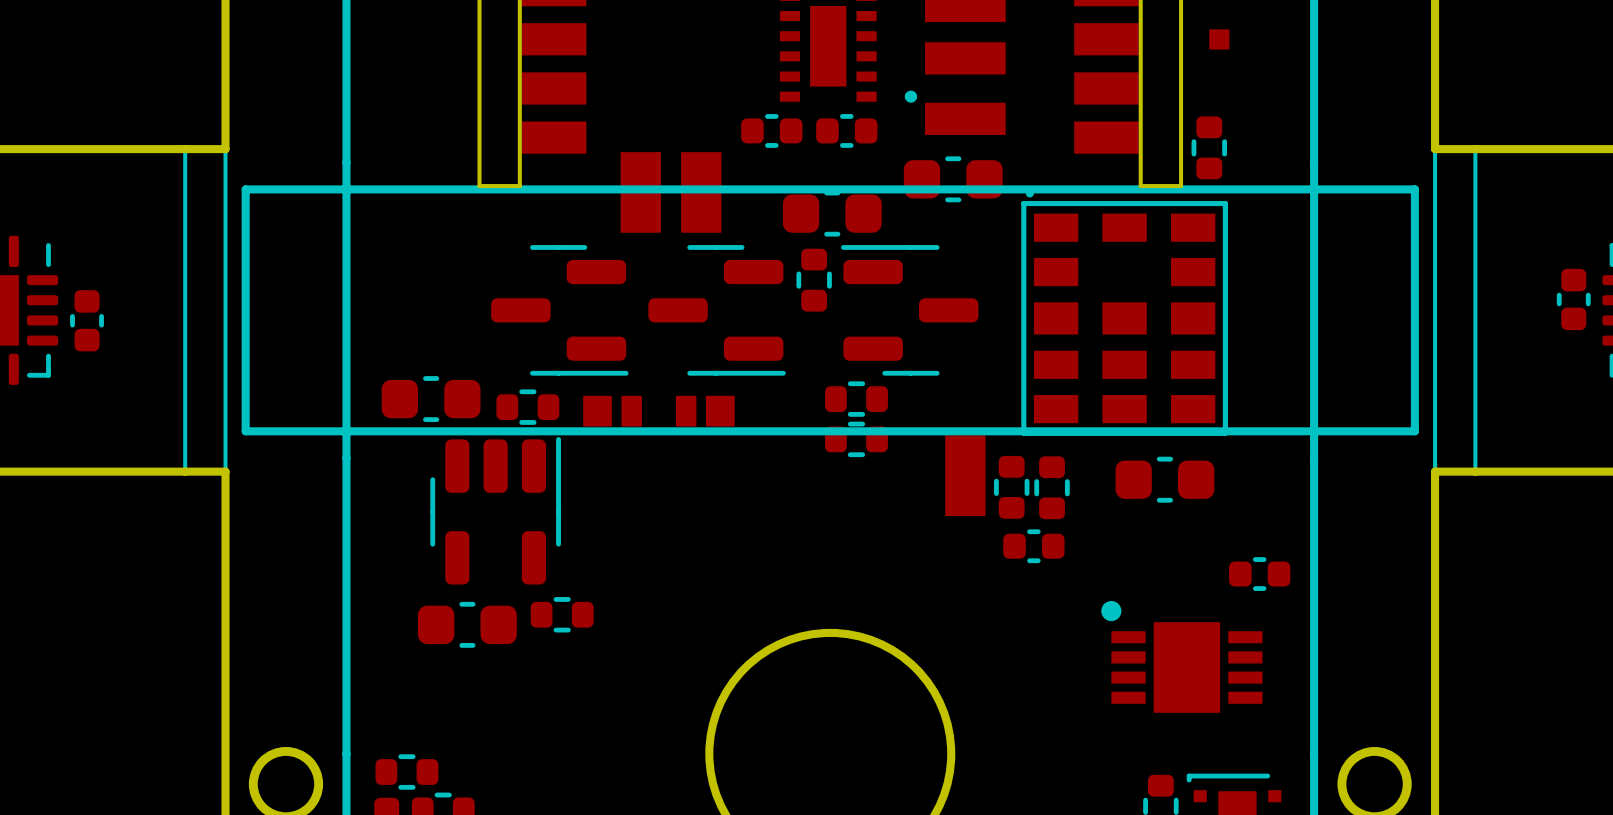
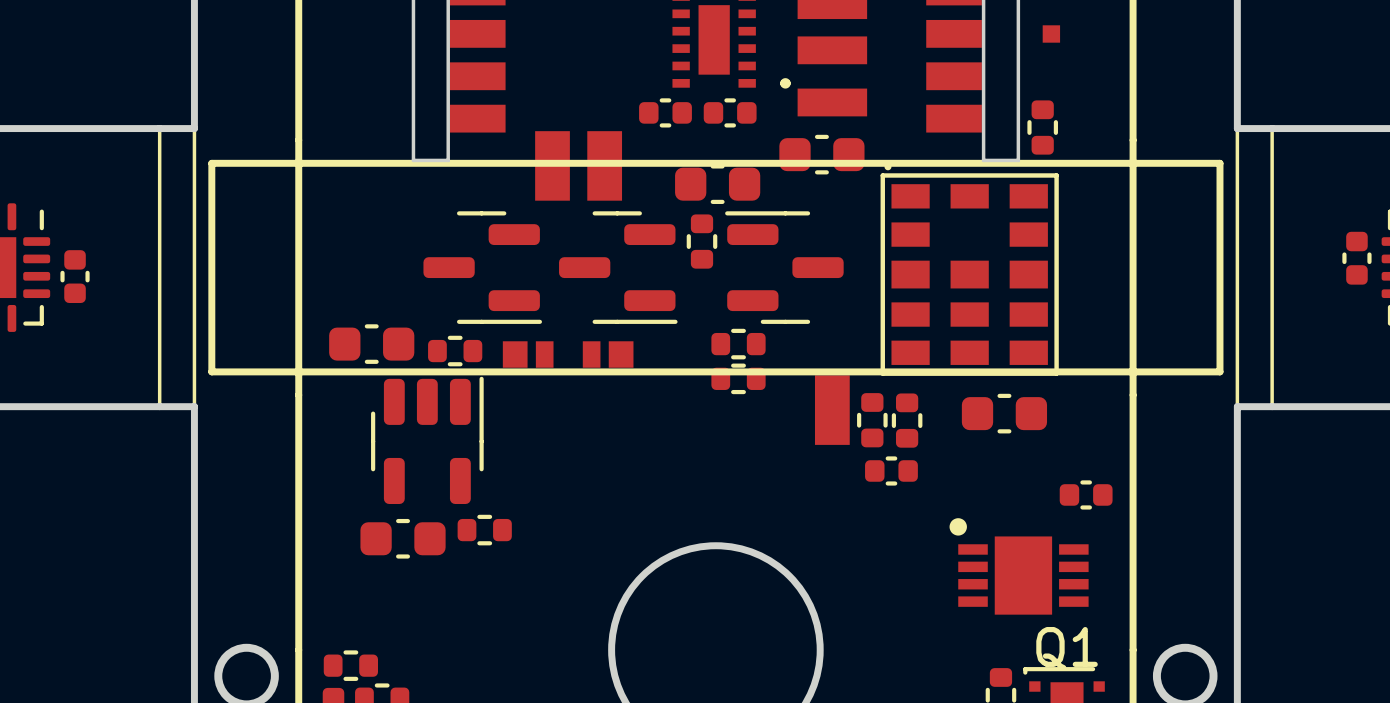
Q1 name: none -> Q1 (1067, 648)

